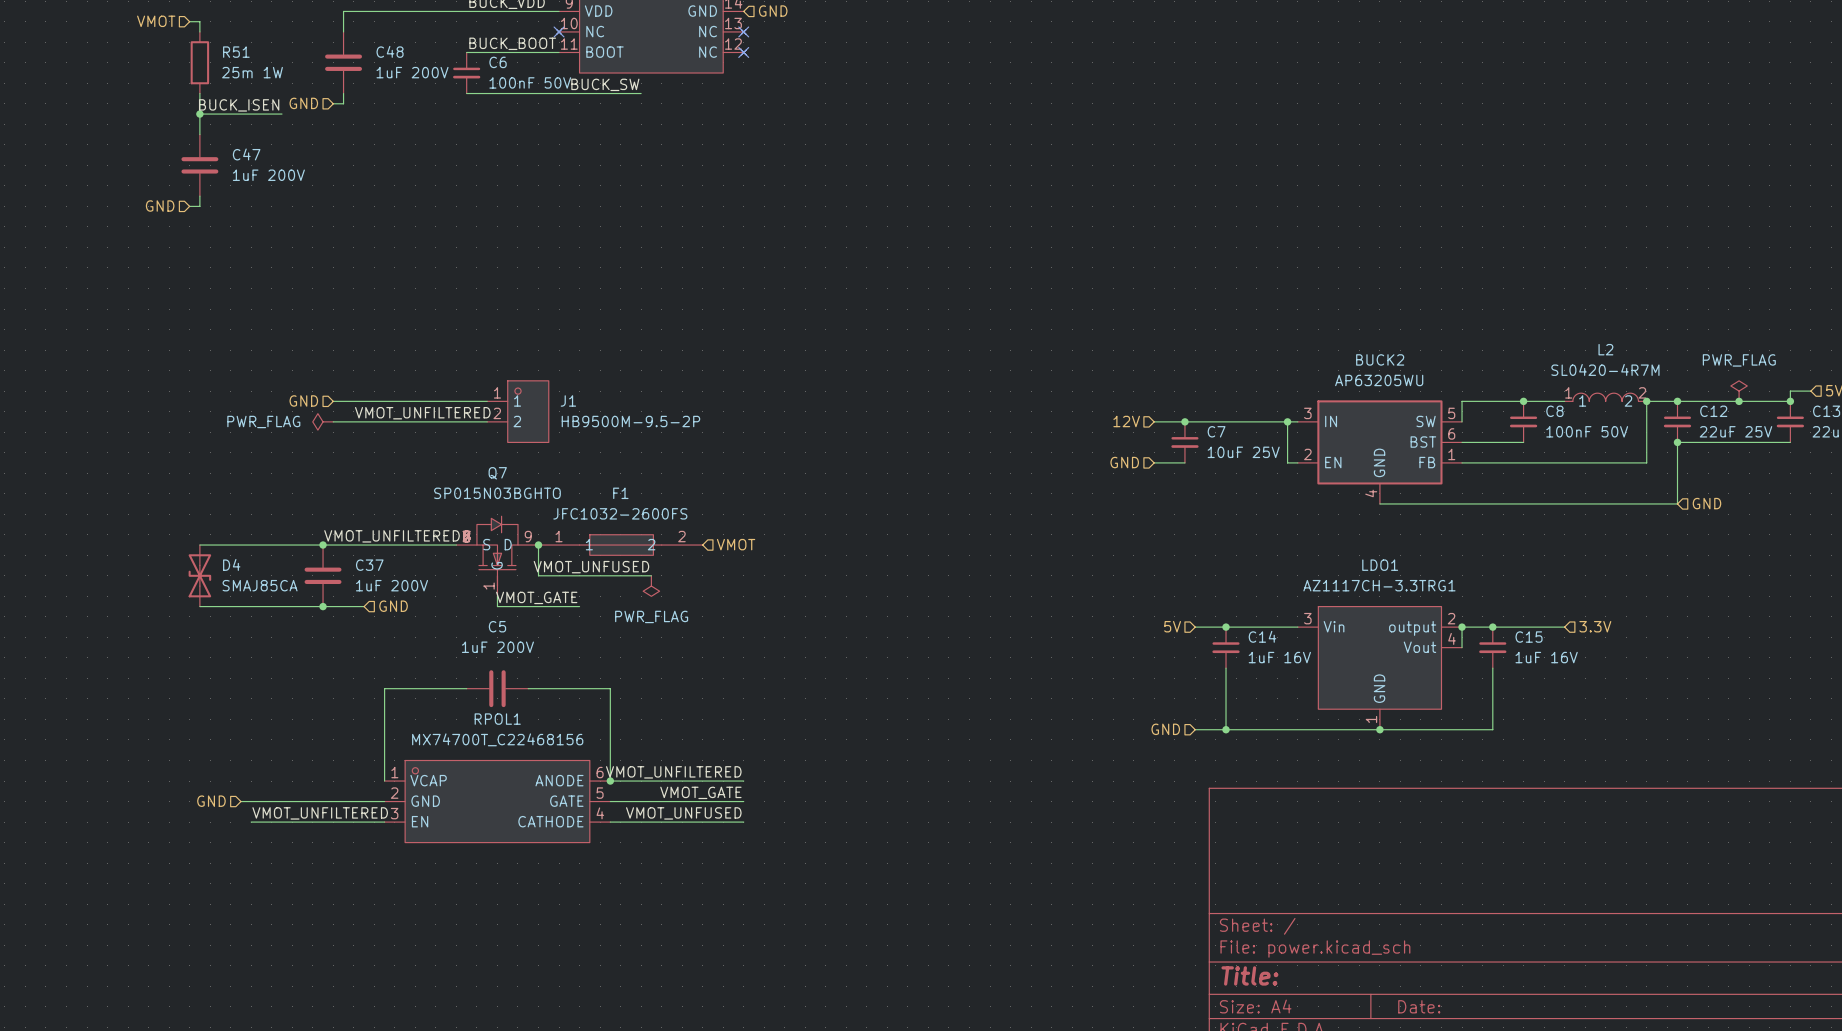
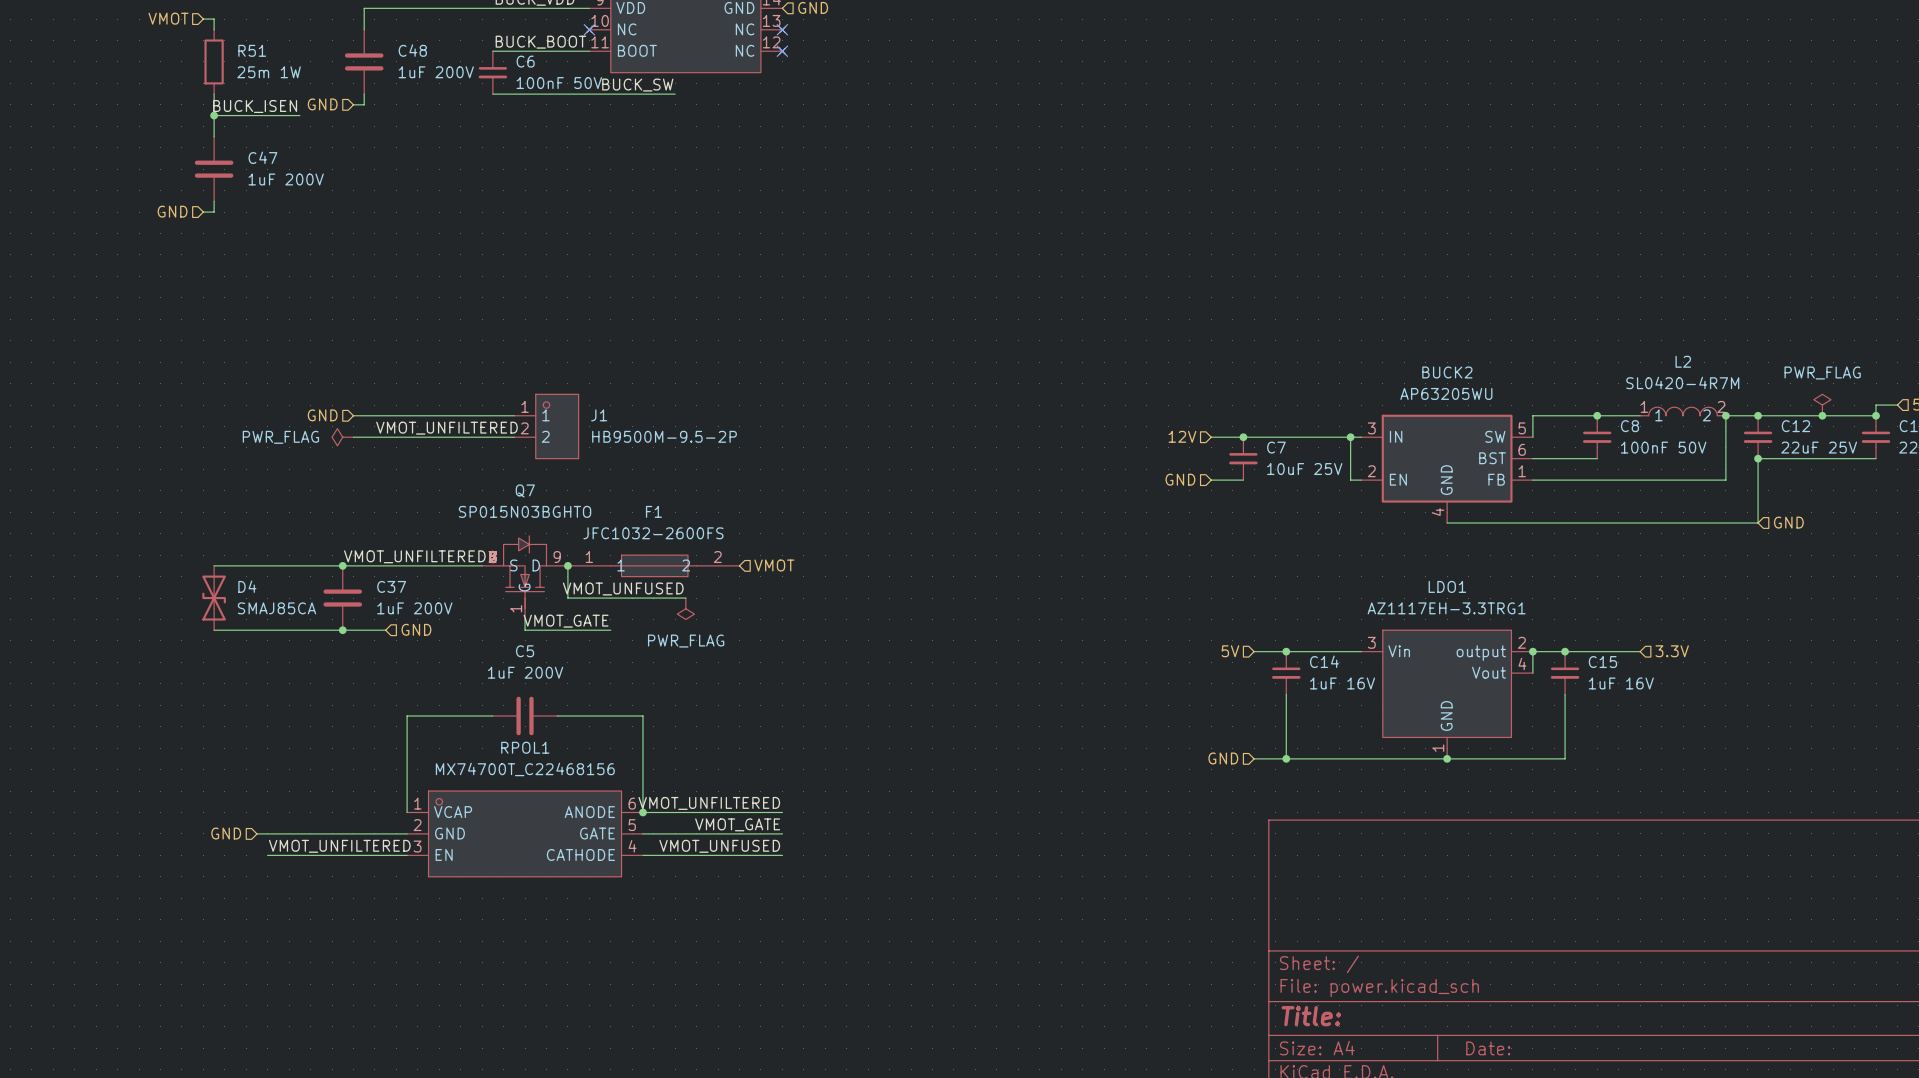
LDO1 value: AZ1117CH-3.3TRG1 (1379, 585) -> AZ1117EH-3.3TRG1 (1446, 608)

